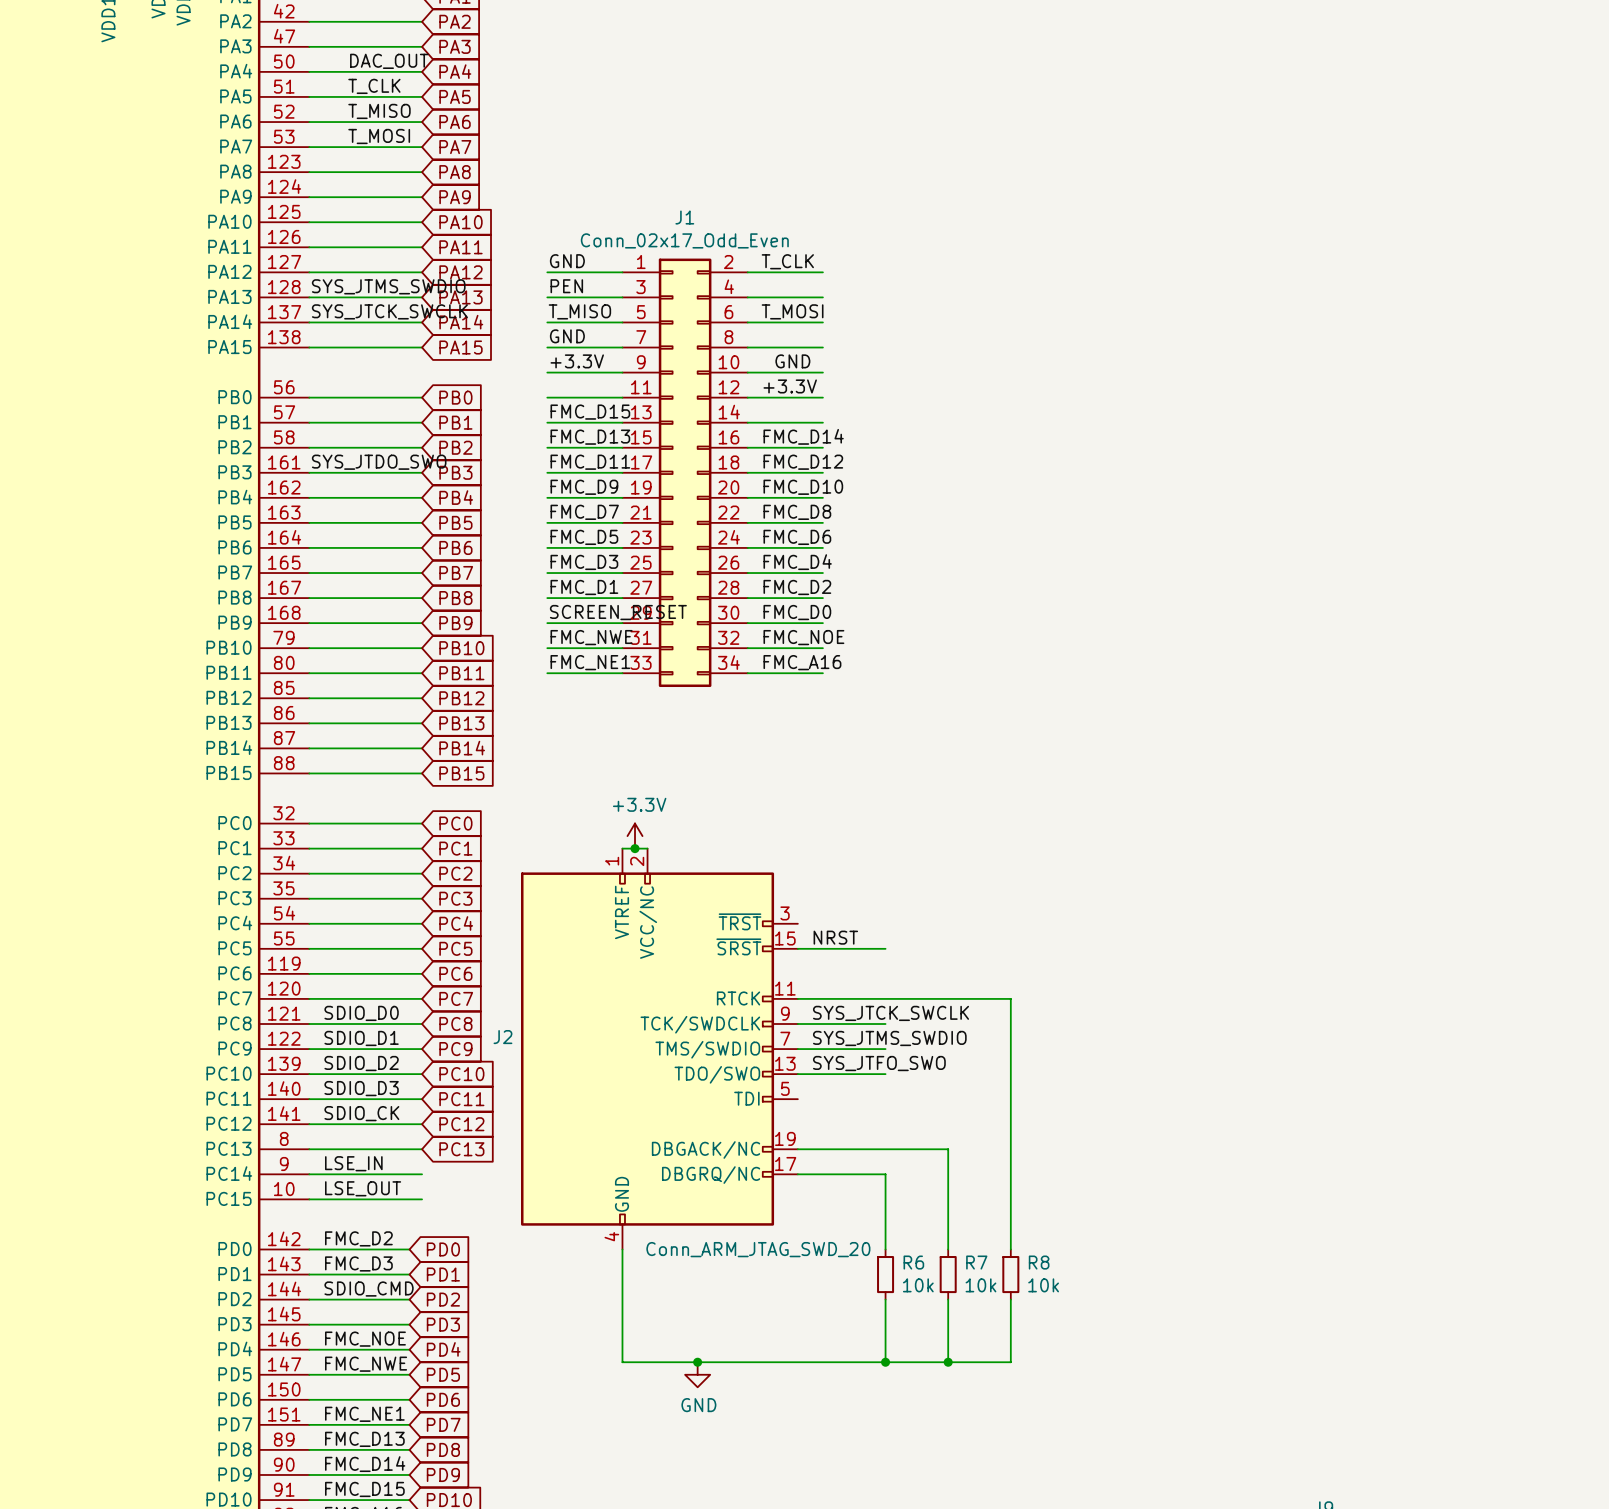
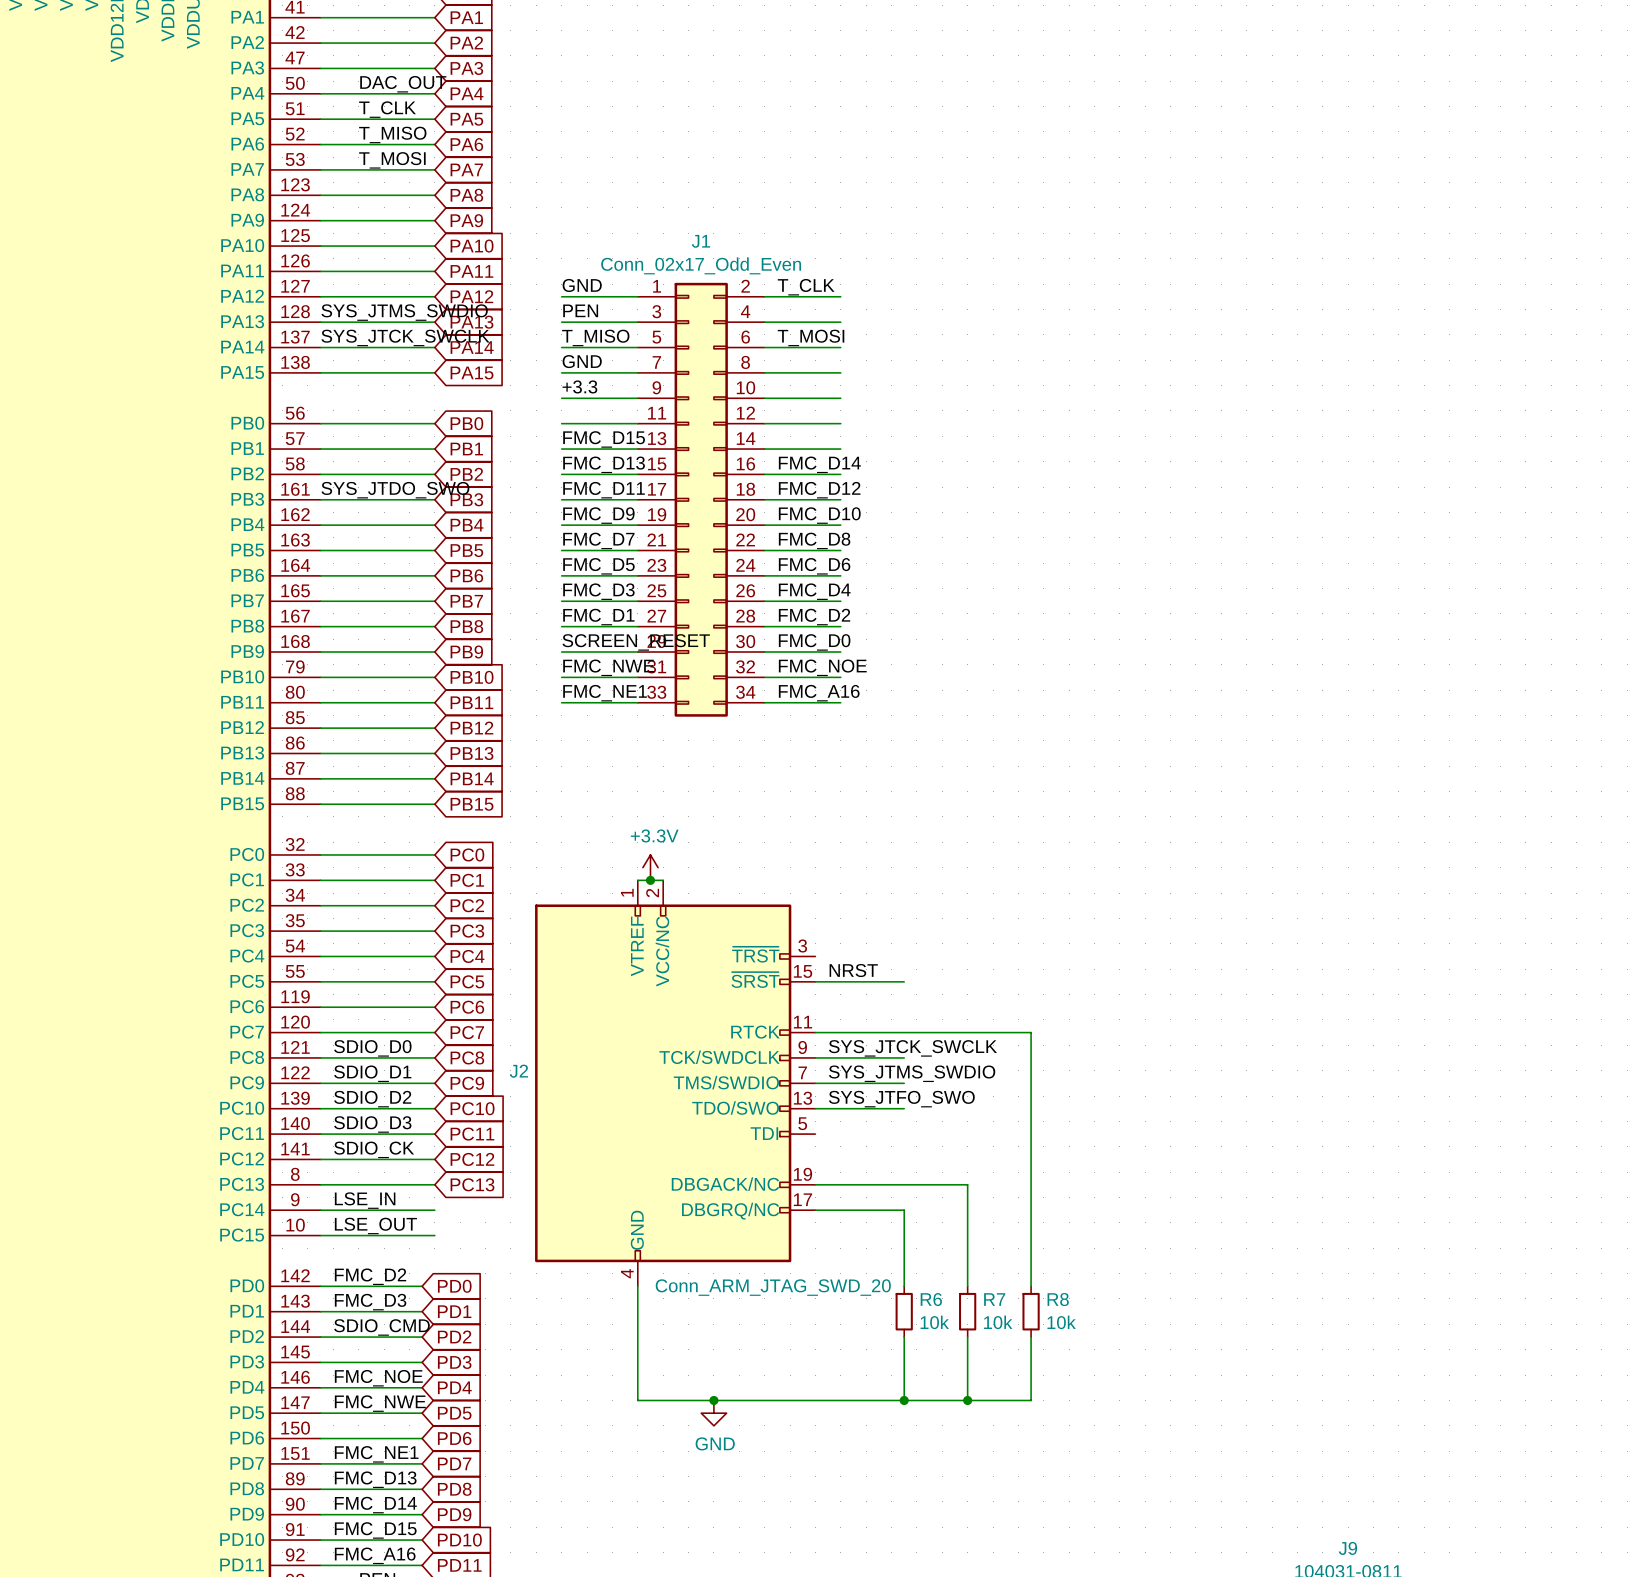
label: +3.3V (577, 361) -> +3.3 (579, 386)
label: GND (792, 361) -> none
label: +3.3V (790, 386) -> none

